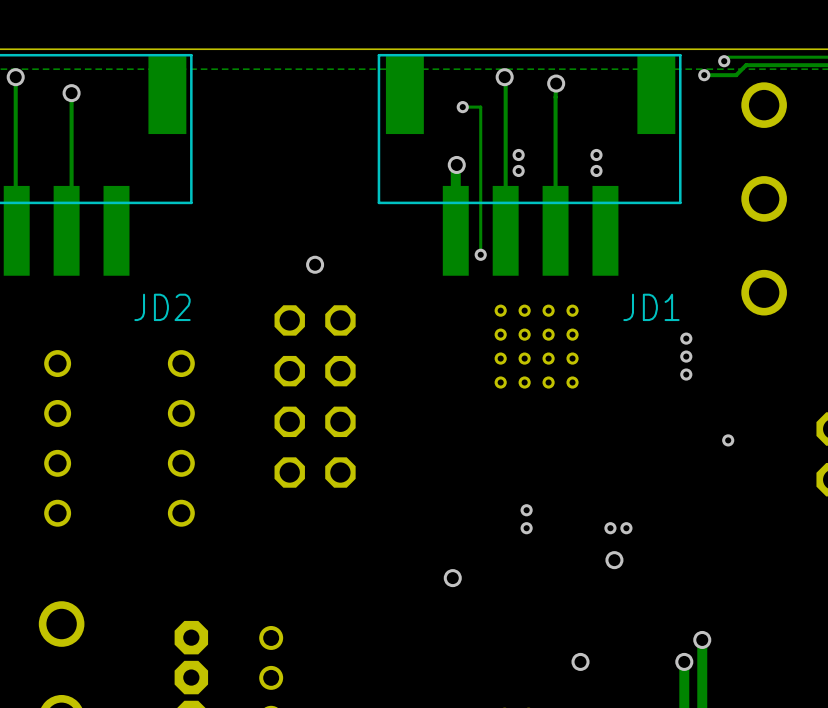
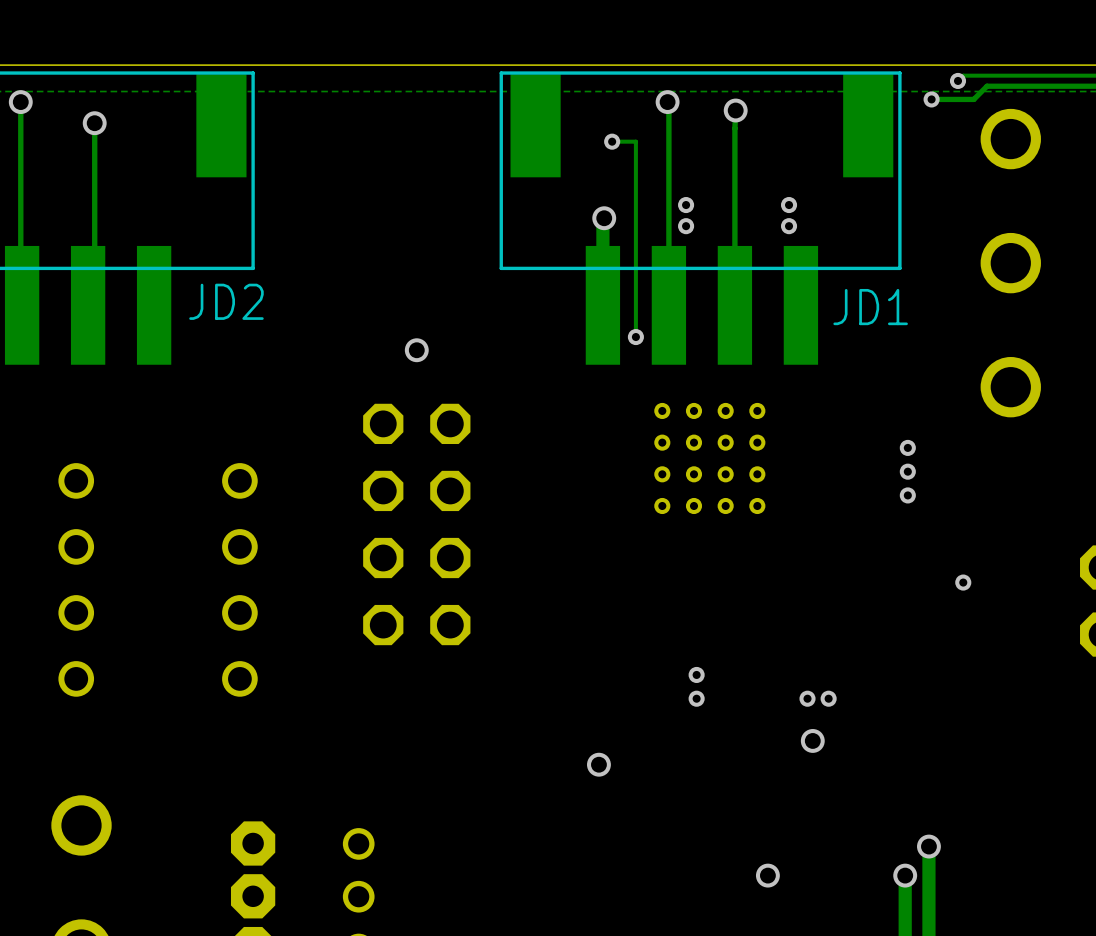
JD2 name position: JD2 (162, 307) -> JD2 (226, 301)
JD1 name position: JD1 (651, 307) -> JD1 (870, 307)

